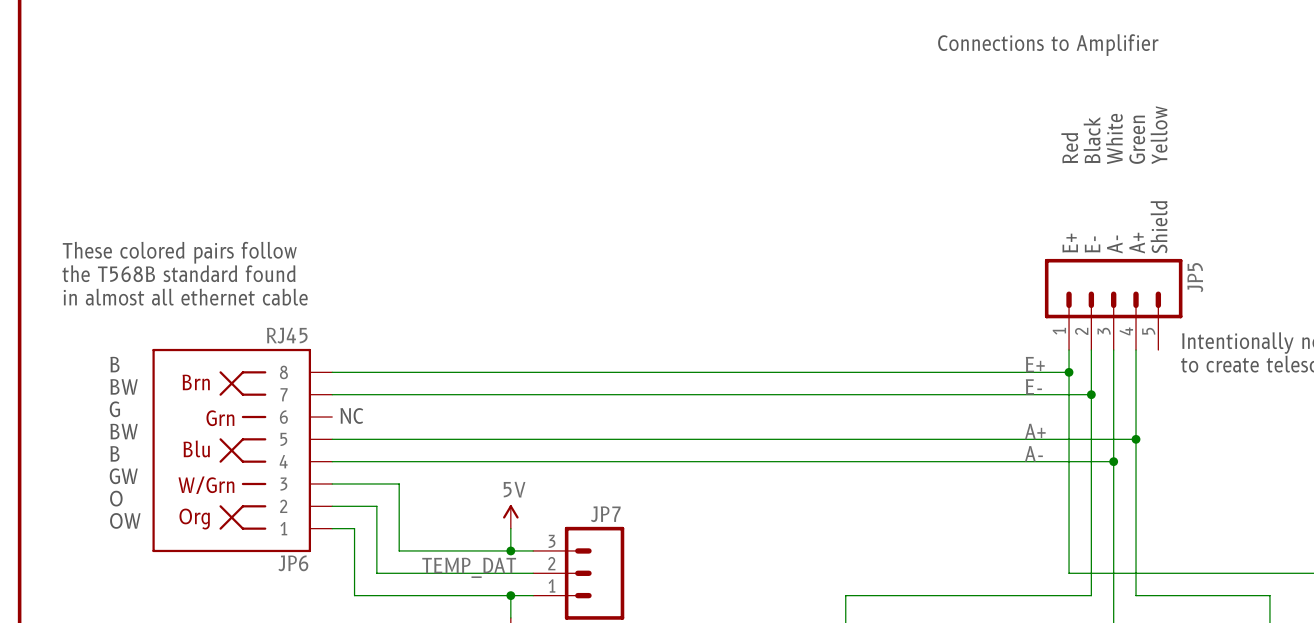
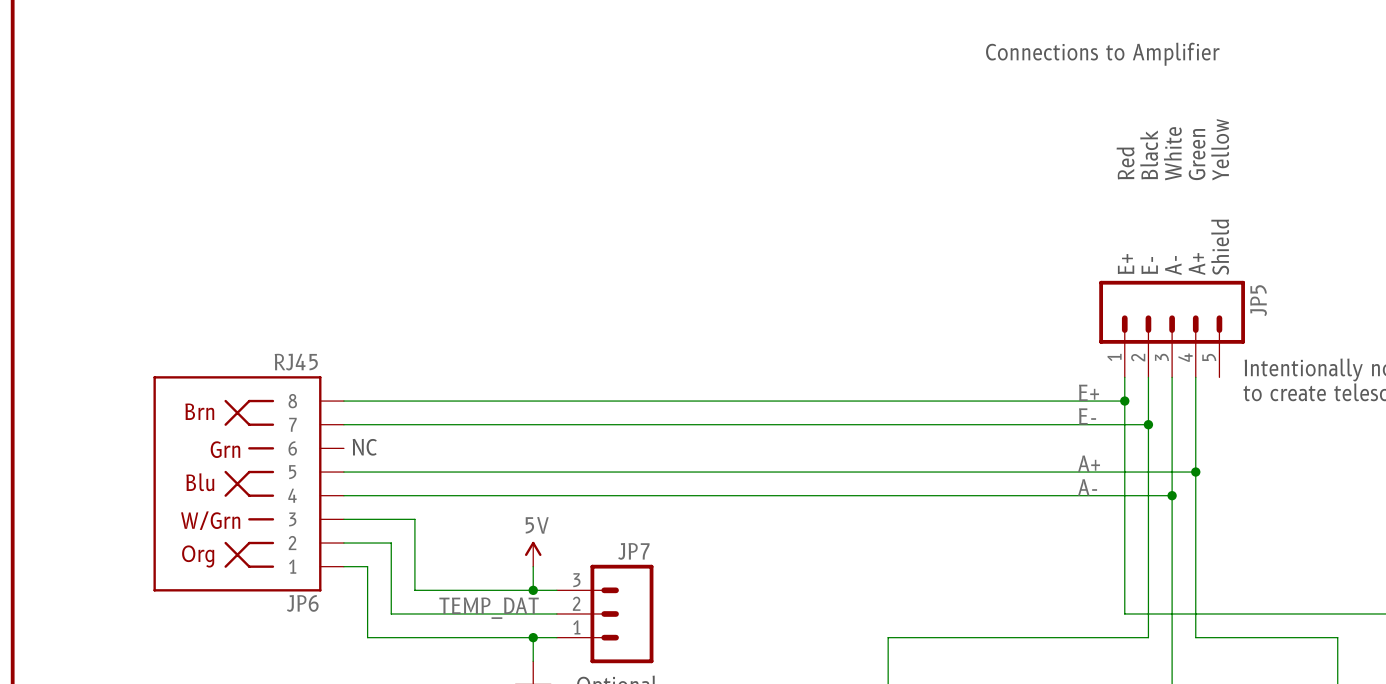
text: These colored pairs follow (179, 252) -> none
text: the T568B standard found (178, 273) -> none
text: in almost all ethernet cable (185, 297) -> none
text: B (114, 364) -> none
text: BW (124, 386) -> none
text: G (114, 409) -> none
text: BW (124, 431) -> none
text: B (114, 453) -> none
text: GW (123, 476) -> none
text: O (116, 498) -> none
text: OW (125, 520) -> none

